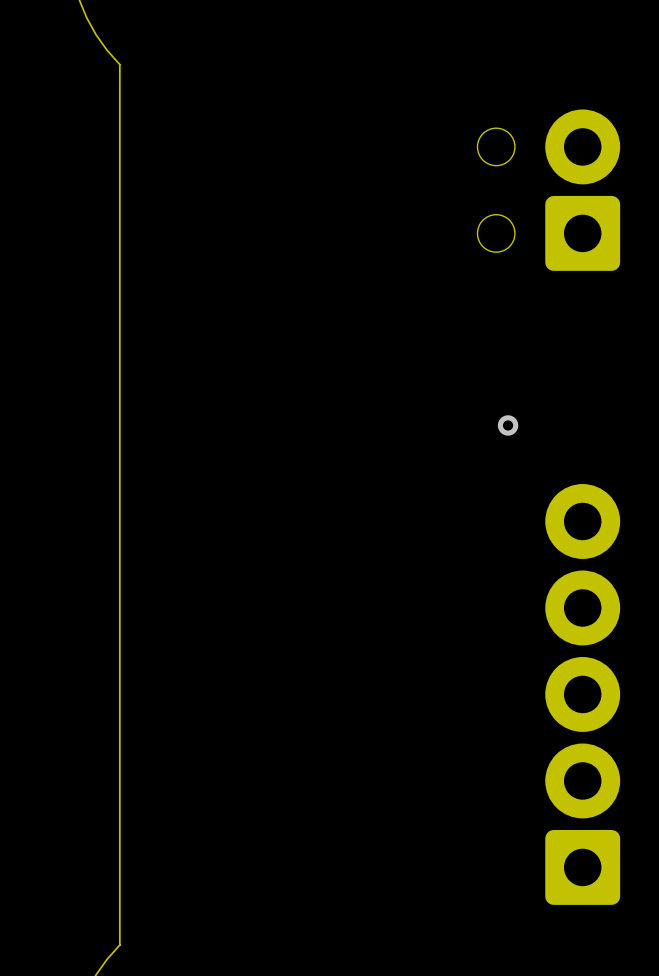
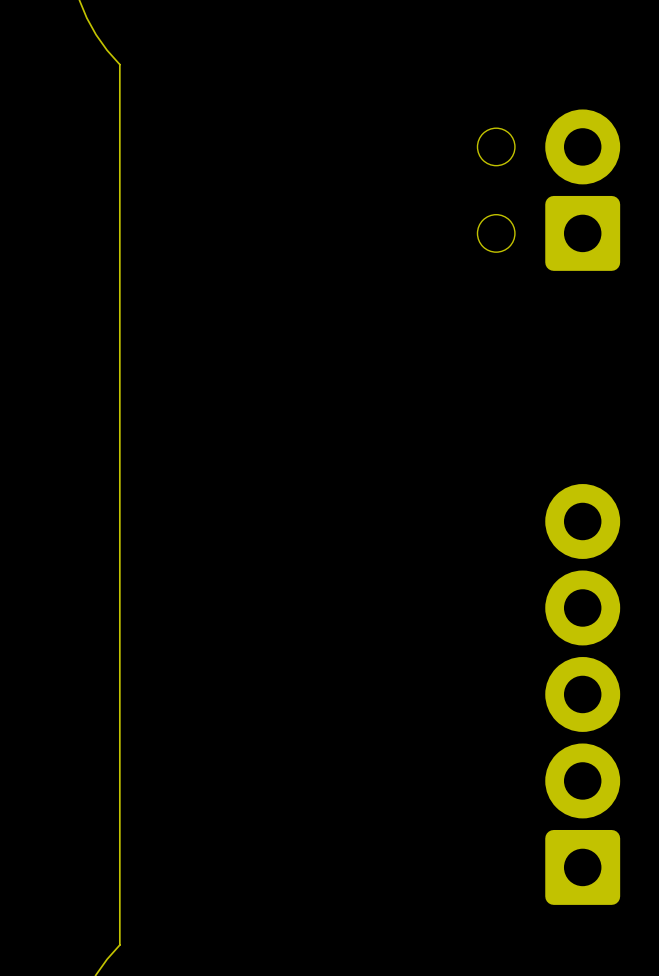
via: (508, 425) -> none

